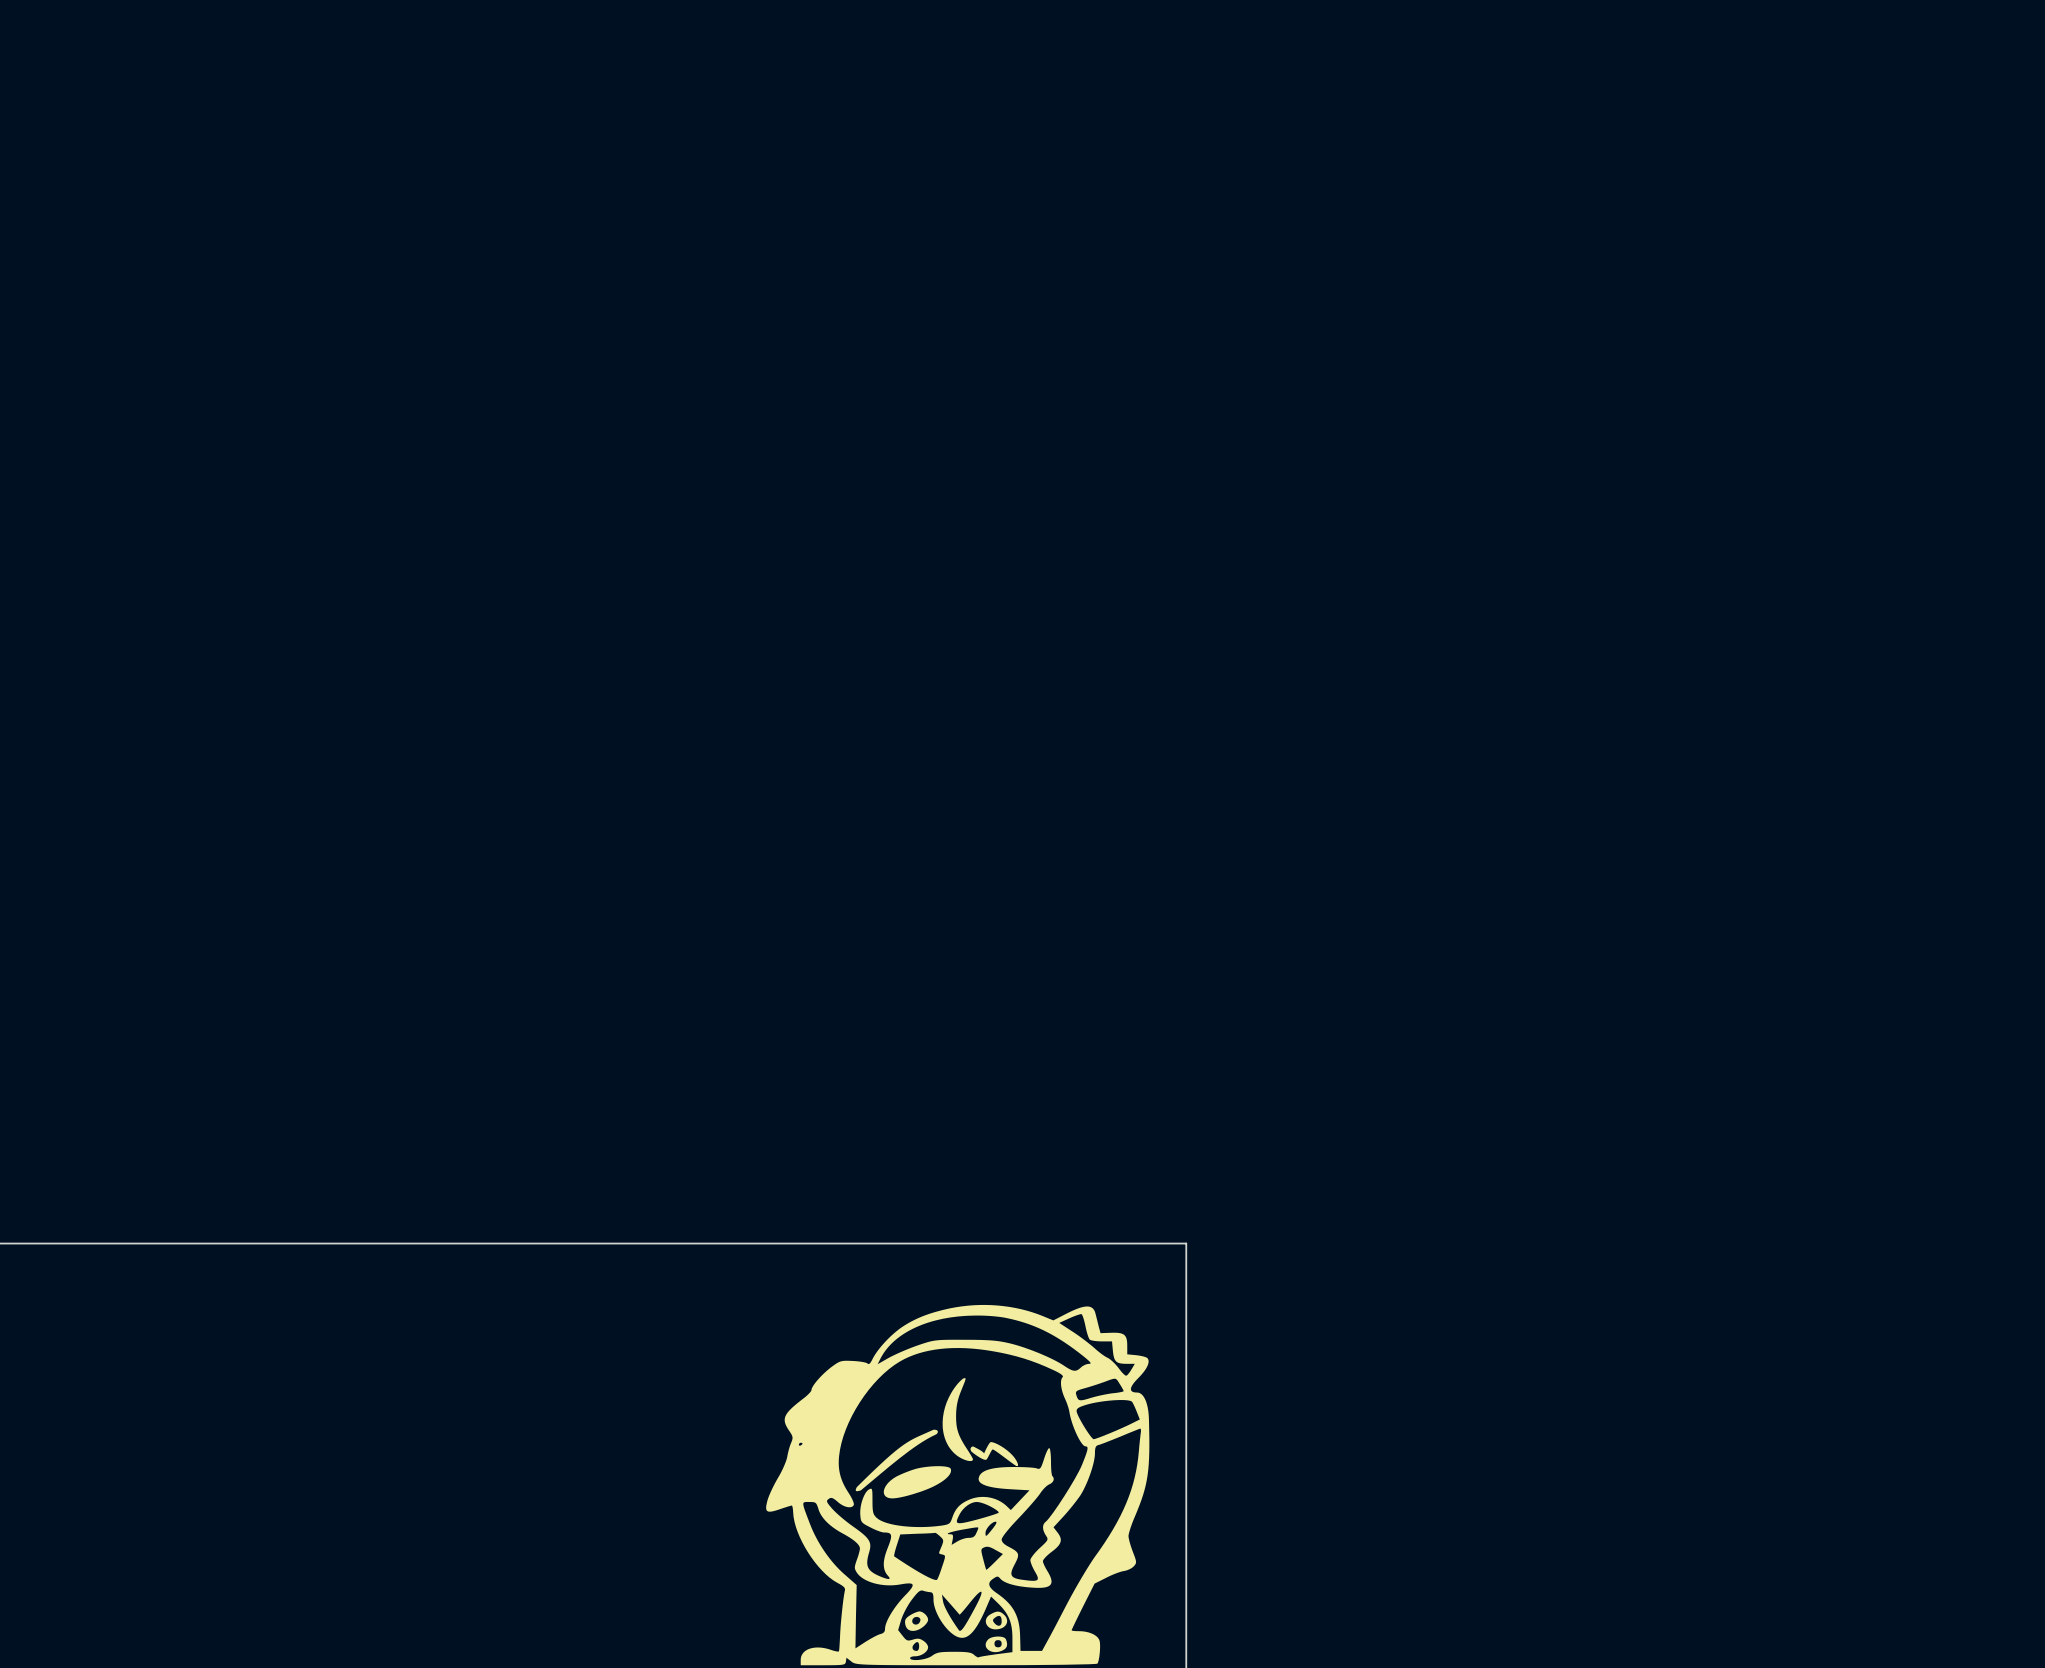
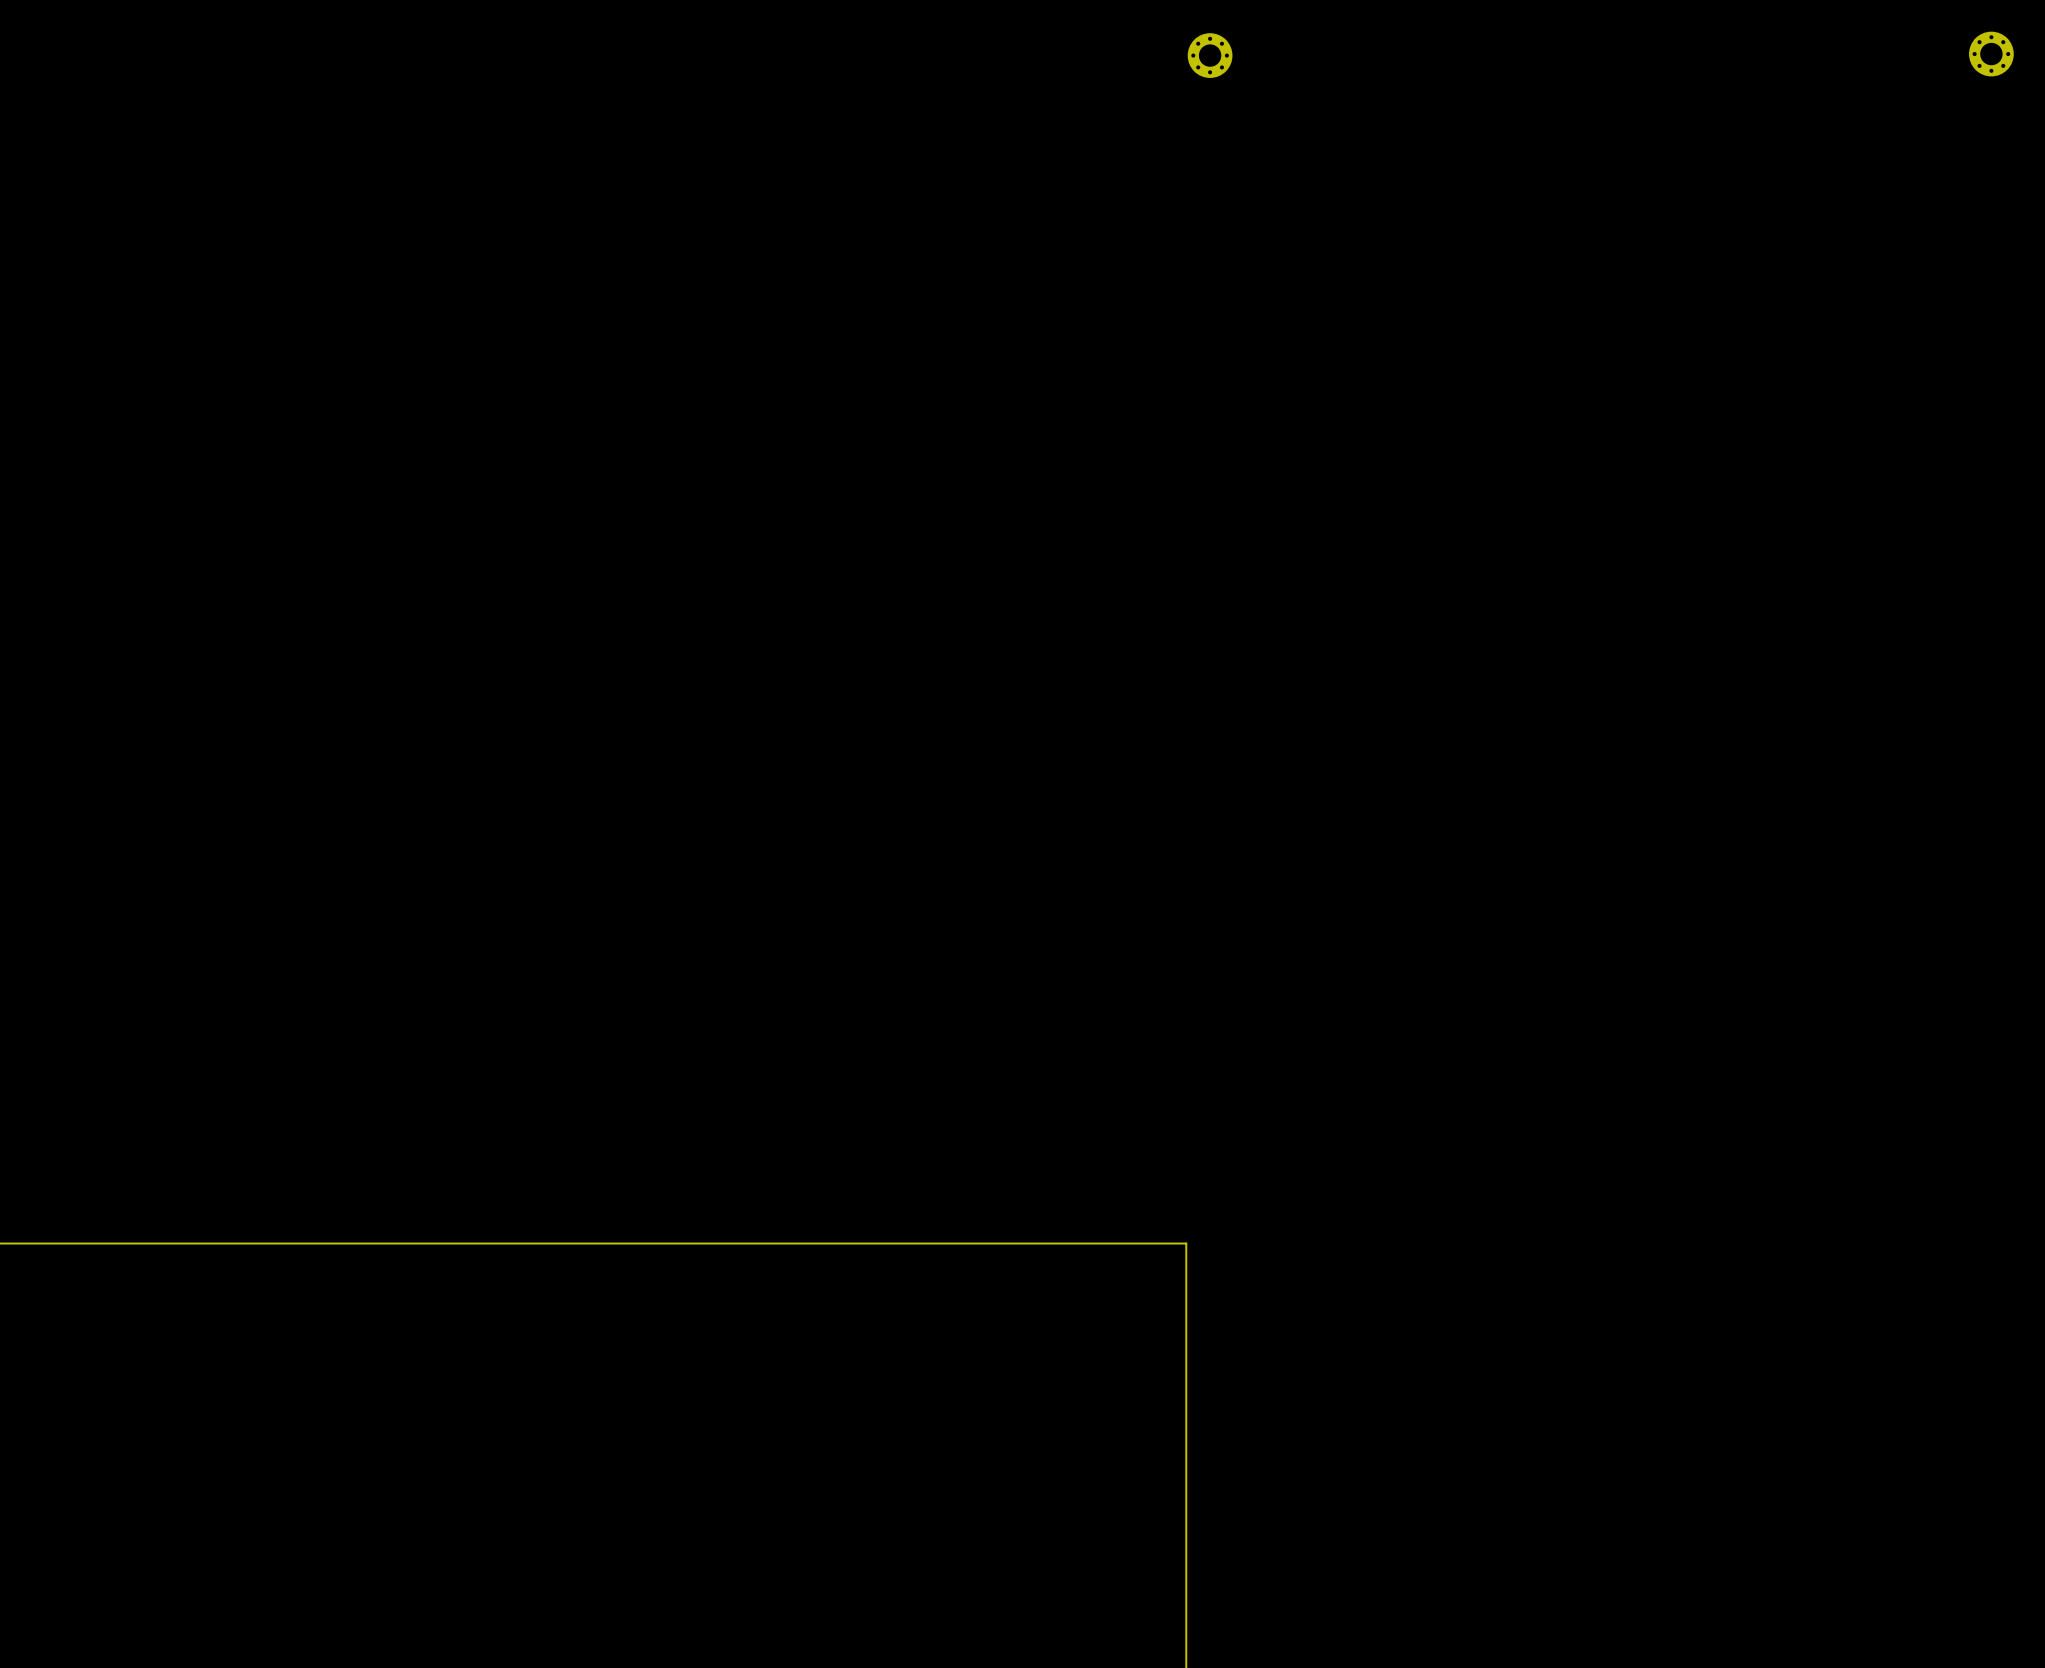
part: none -> (1991, 54)
part: none -> (1210, 55)
drawing: [766, 1304, 1150, 1666] -> none

